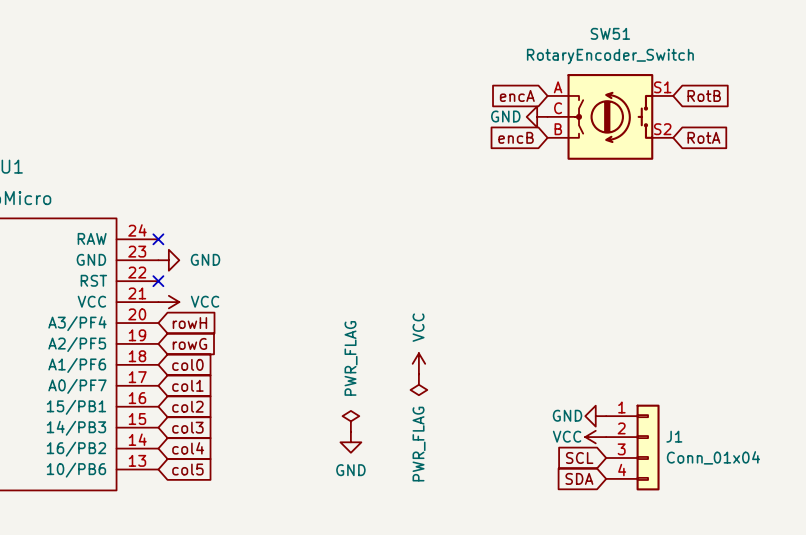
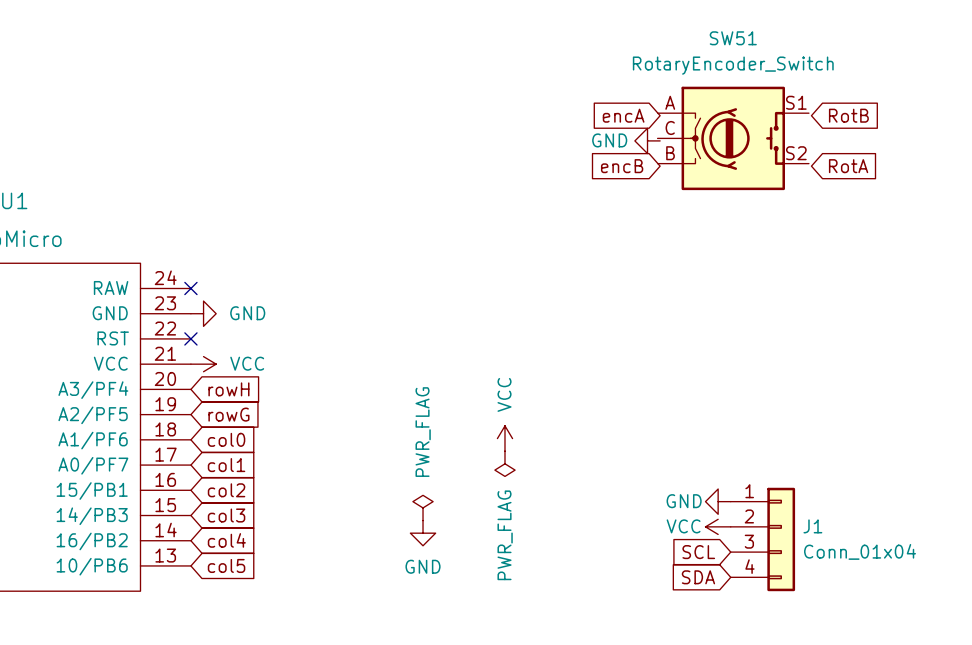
SW51 symbol: [547, 74, 674, 160] -> [657, 86, 809, 191]

